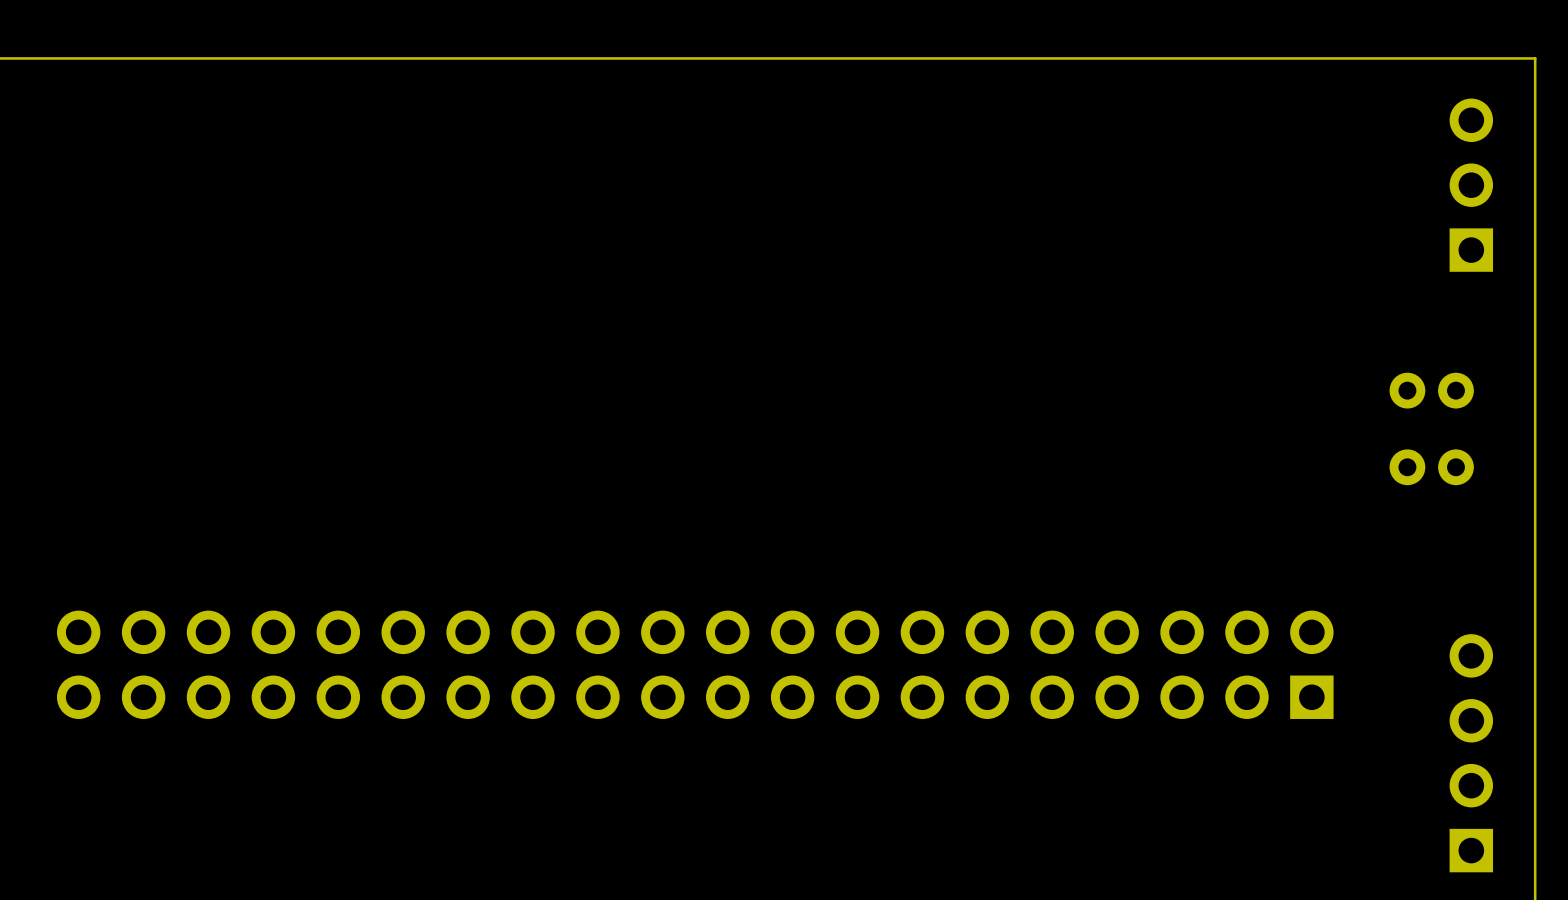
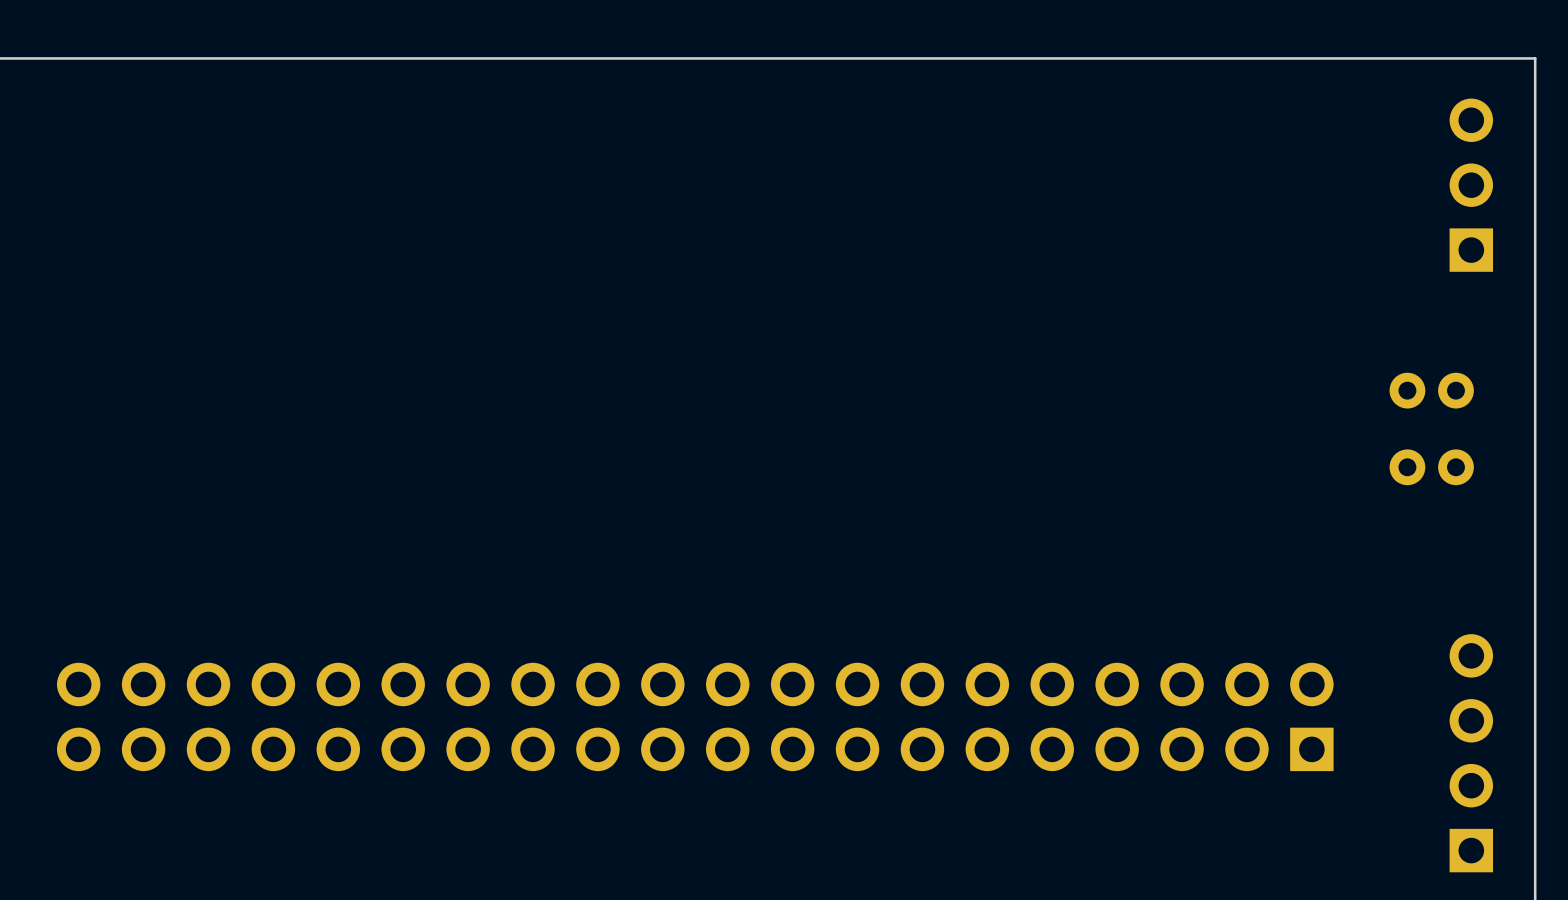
part position: (695, 664) -> (695, 716)

